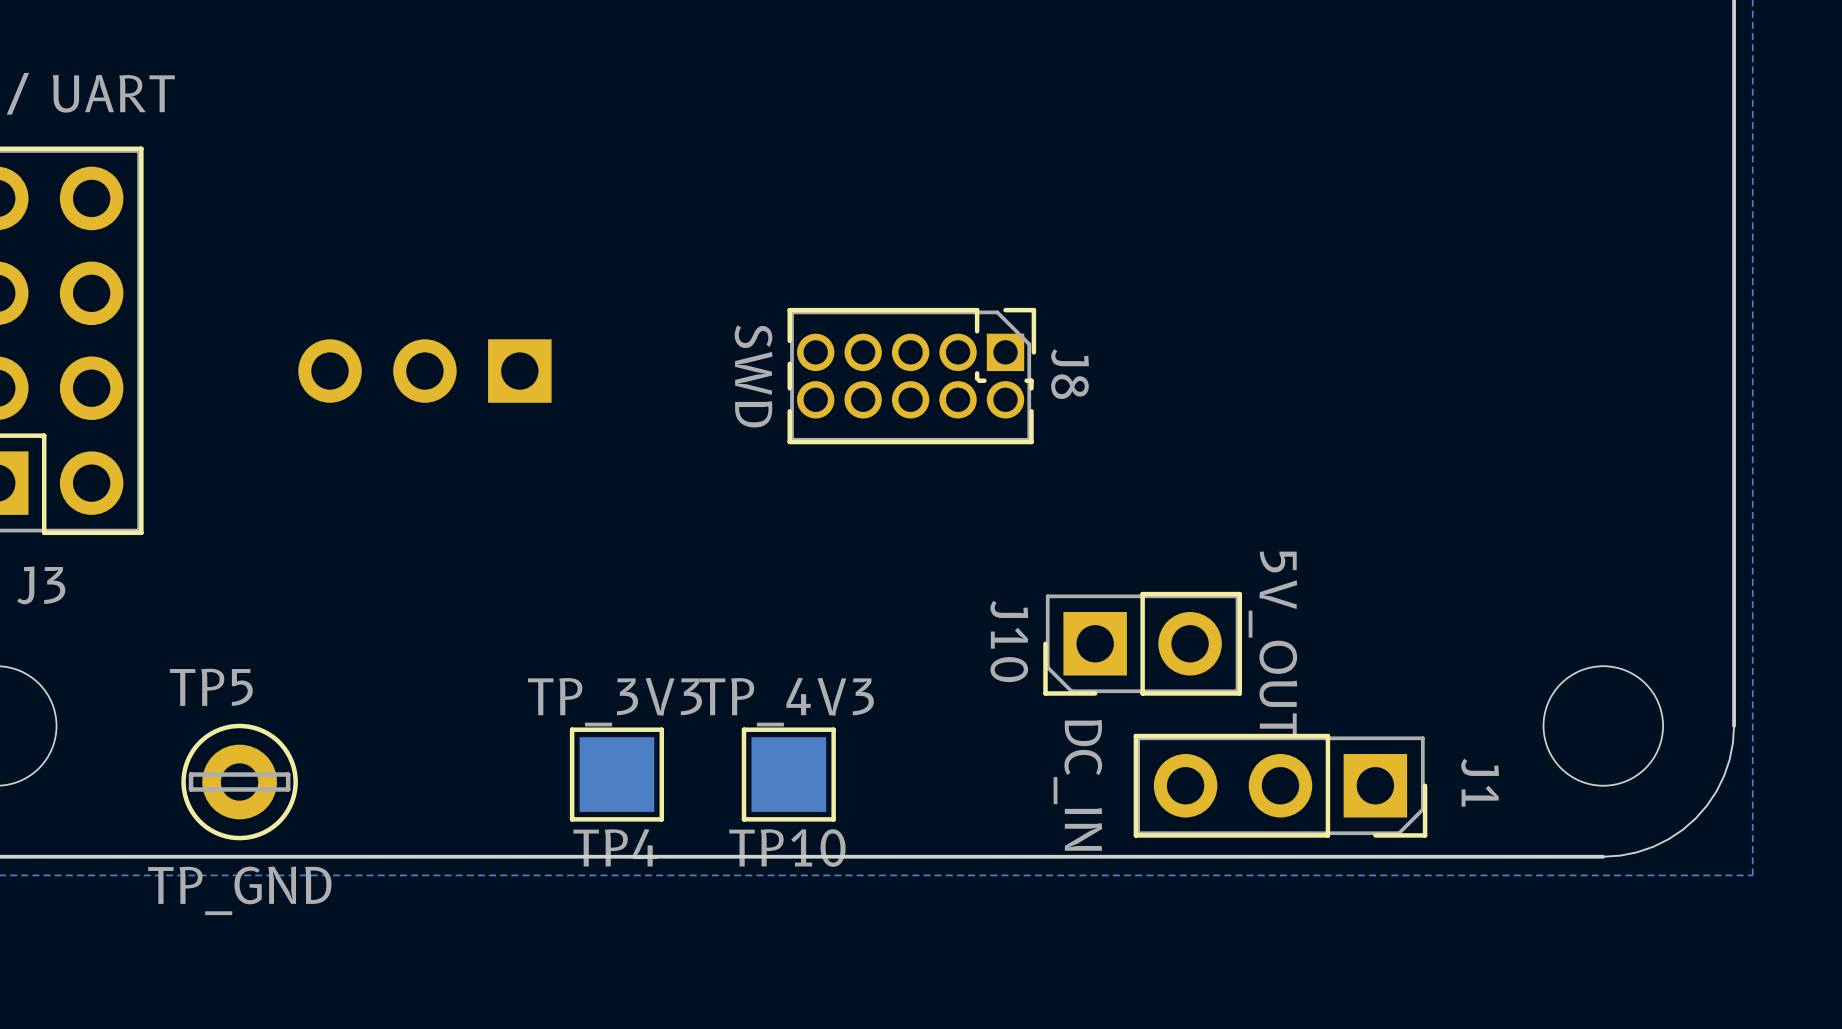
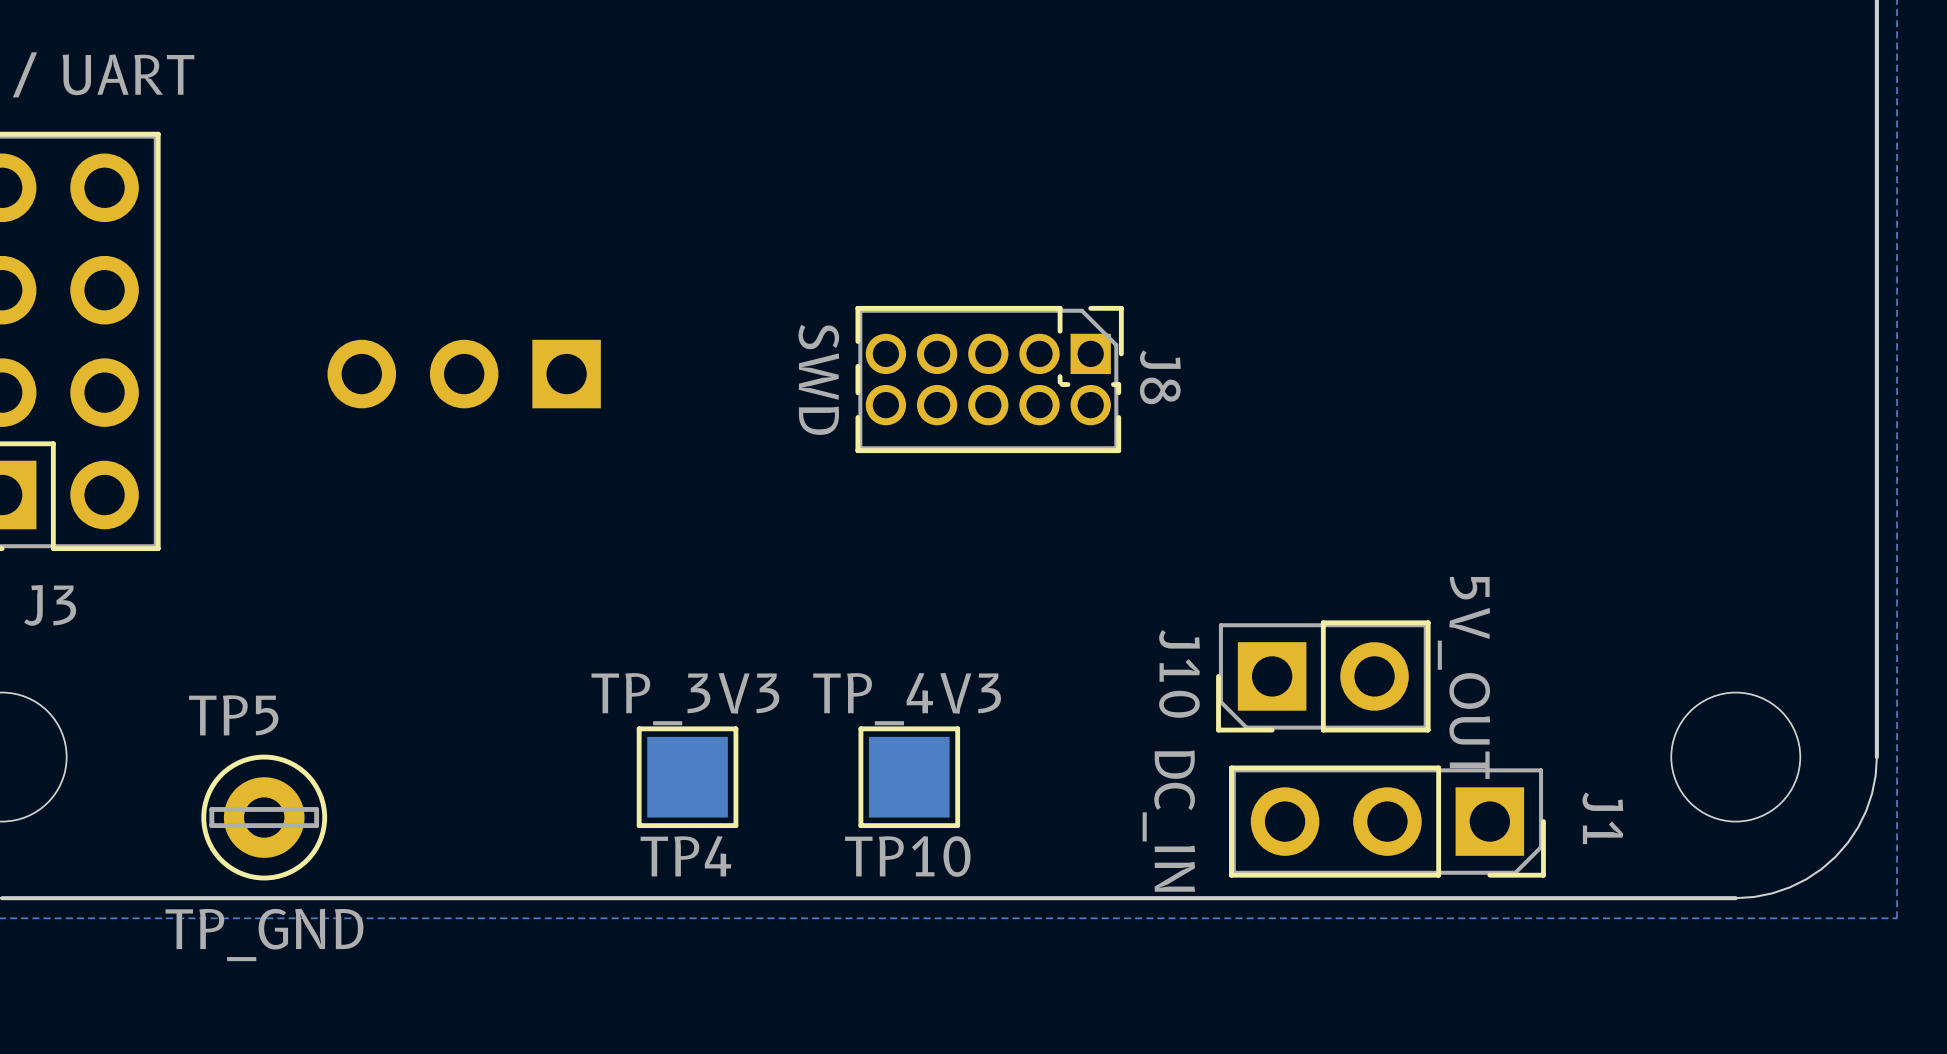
J10 position: (1142, 643) -> (1323, 676)
TP4 position: (616, 774) -> (687, 777)
TP10 position: (788, 774) -> (909, 777)

